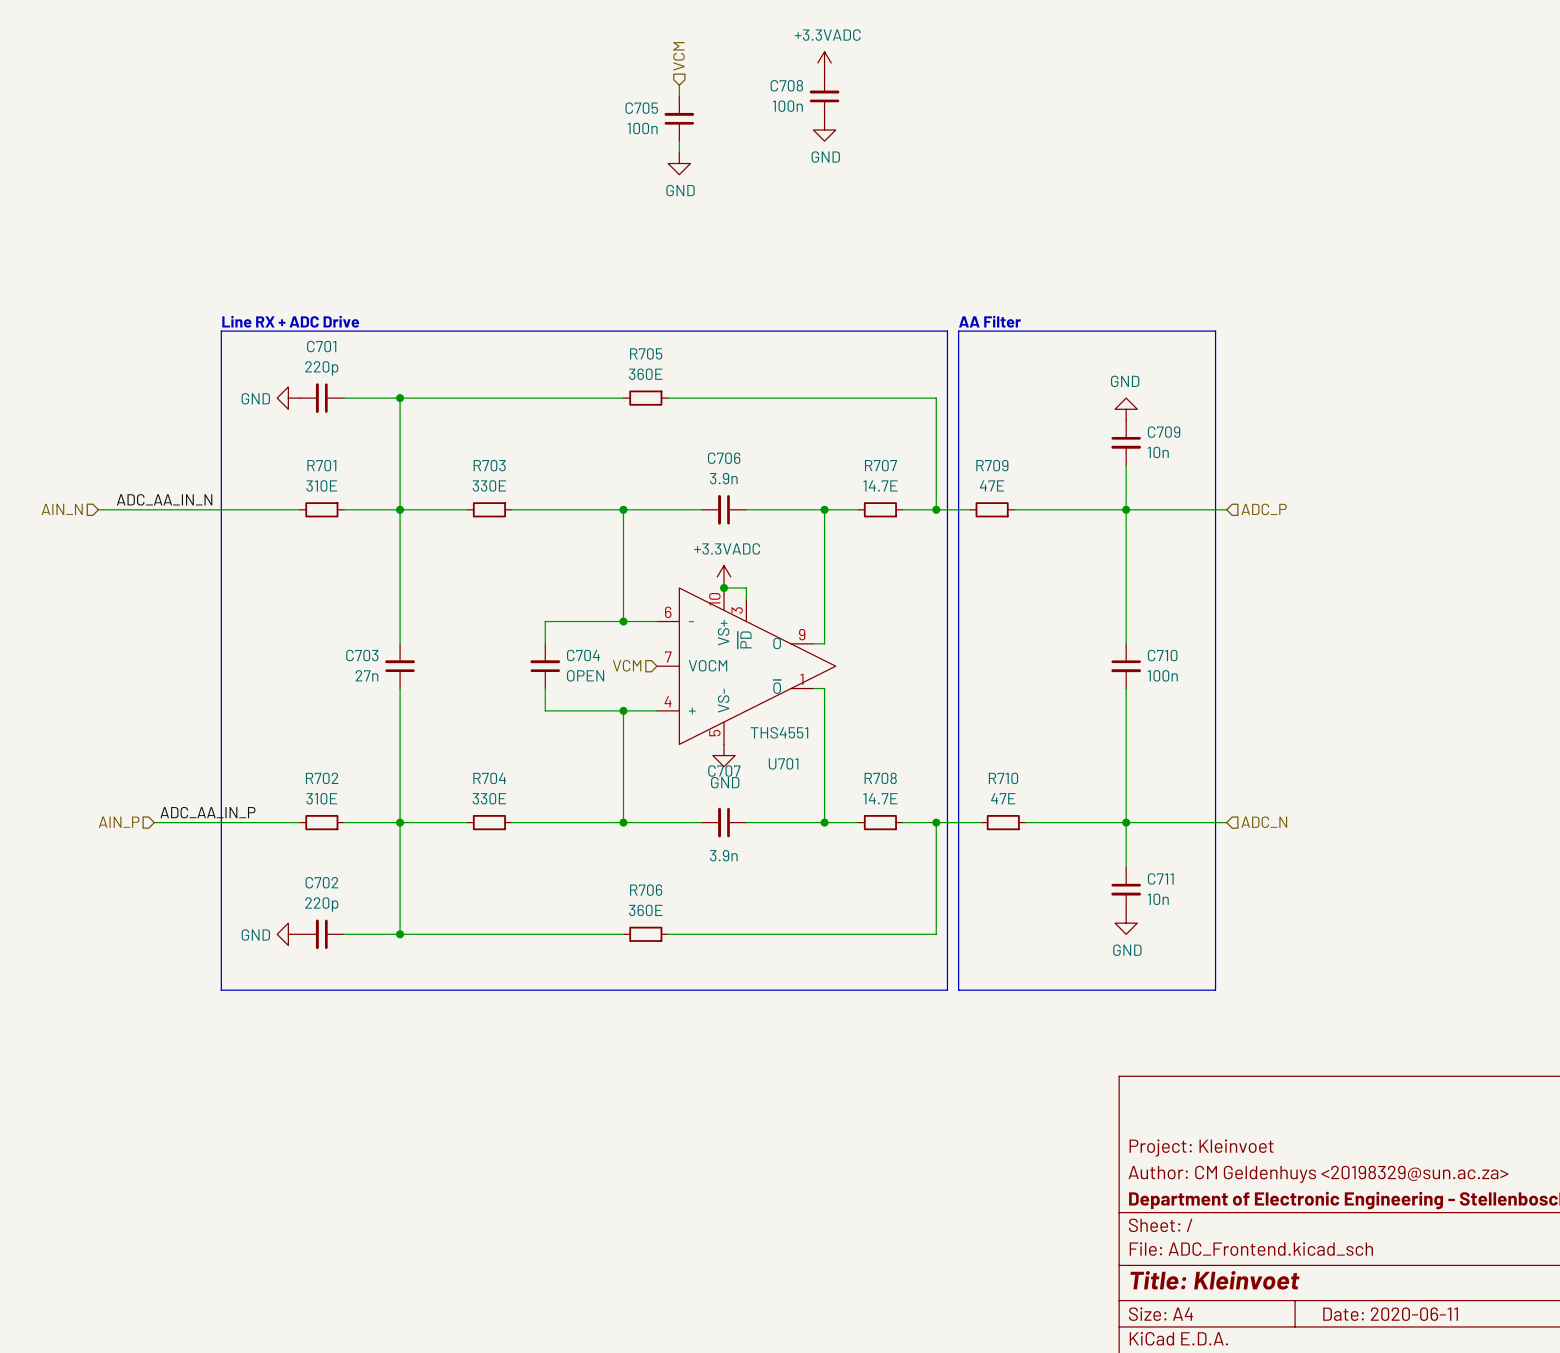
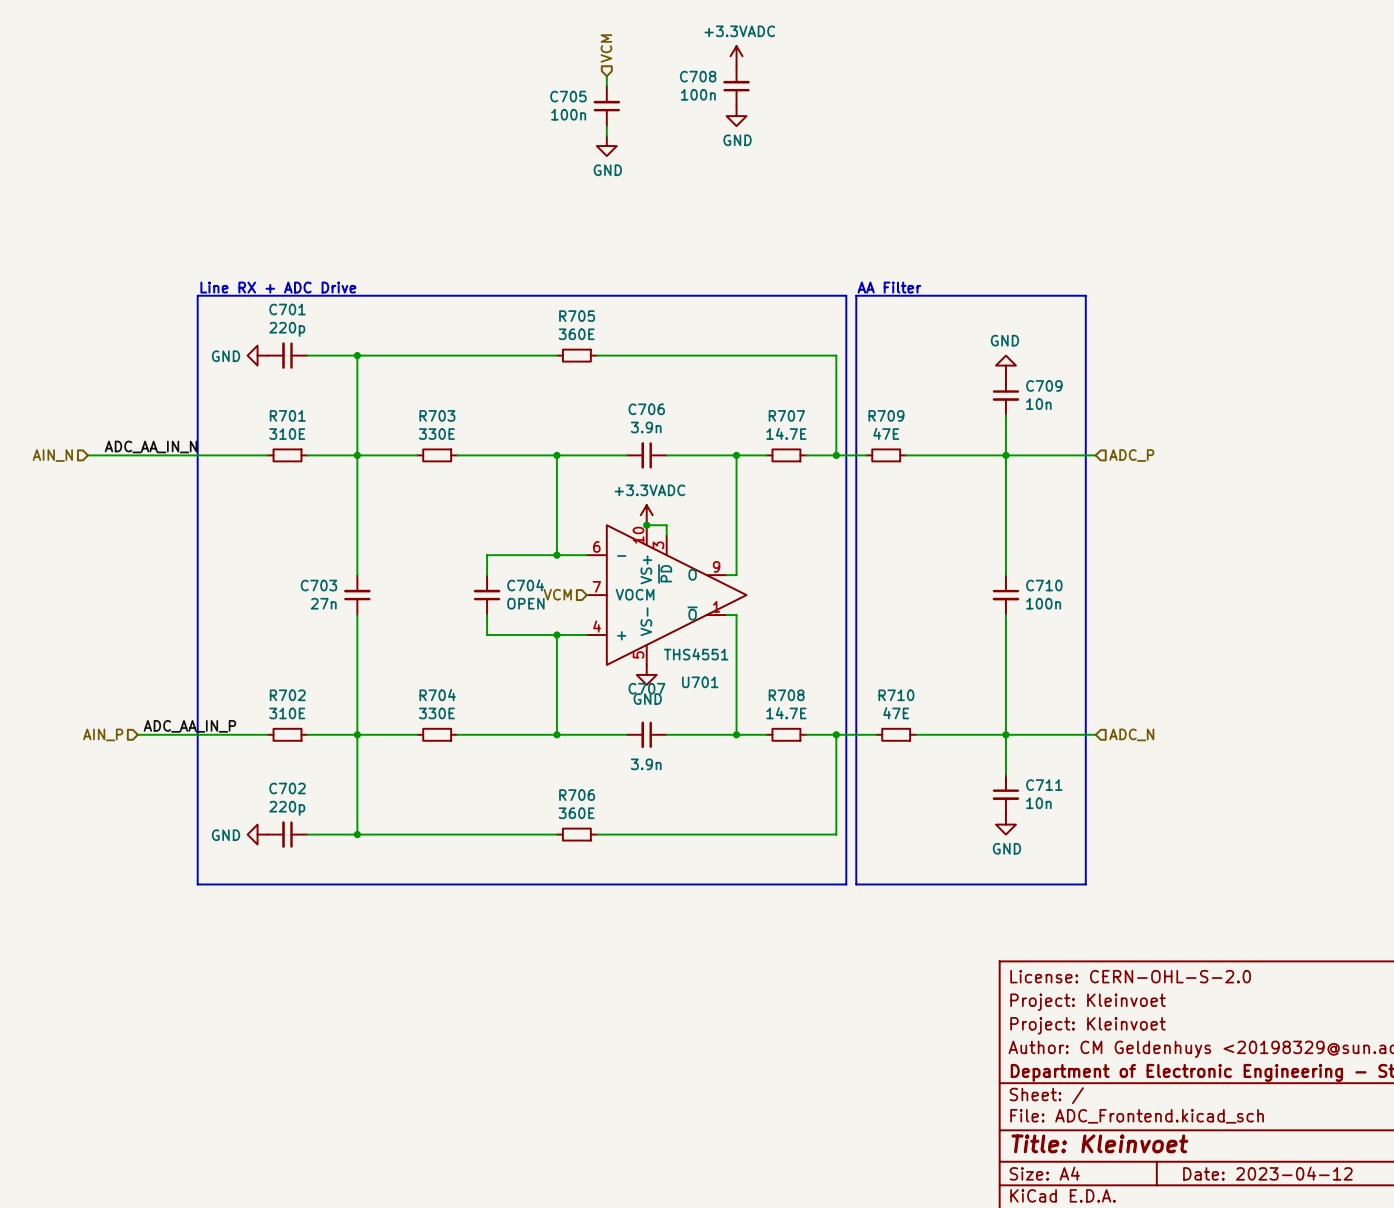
title block: none -> License: CERN-OHL-S-2.0 (1130, 976)
title block: none -> Project: Kleinvoet (1088, 1002)
title block: Date: 2020-06-11 (1390, 1314) -> Date: 2023-04-12 (1267, 1173)

